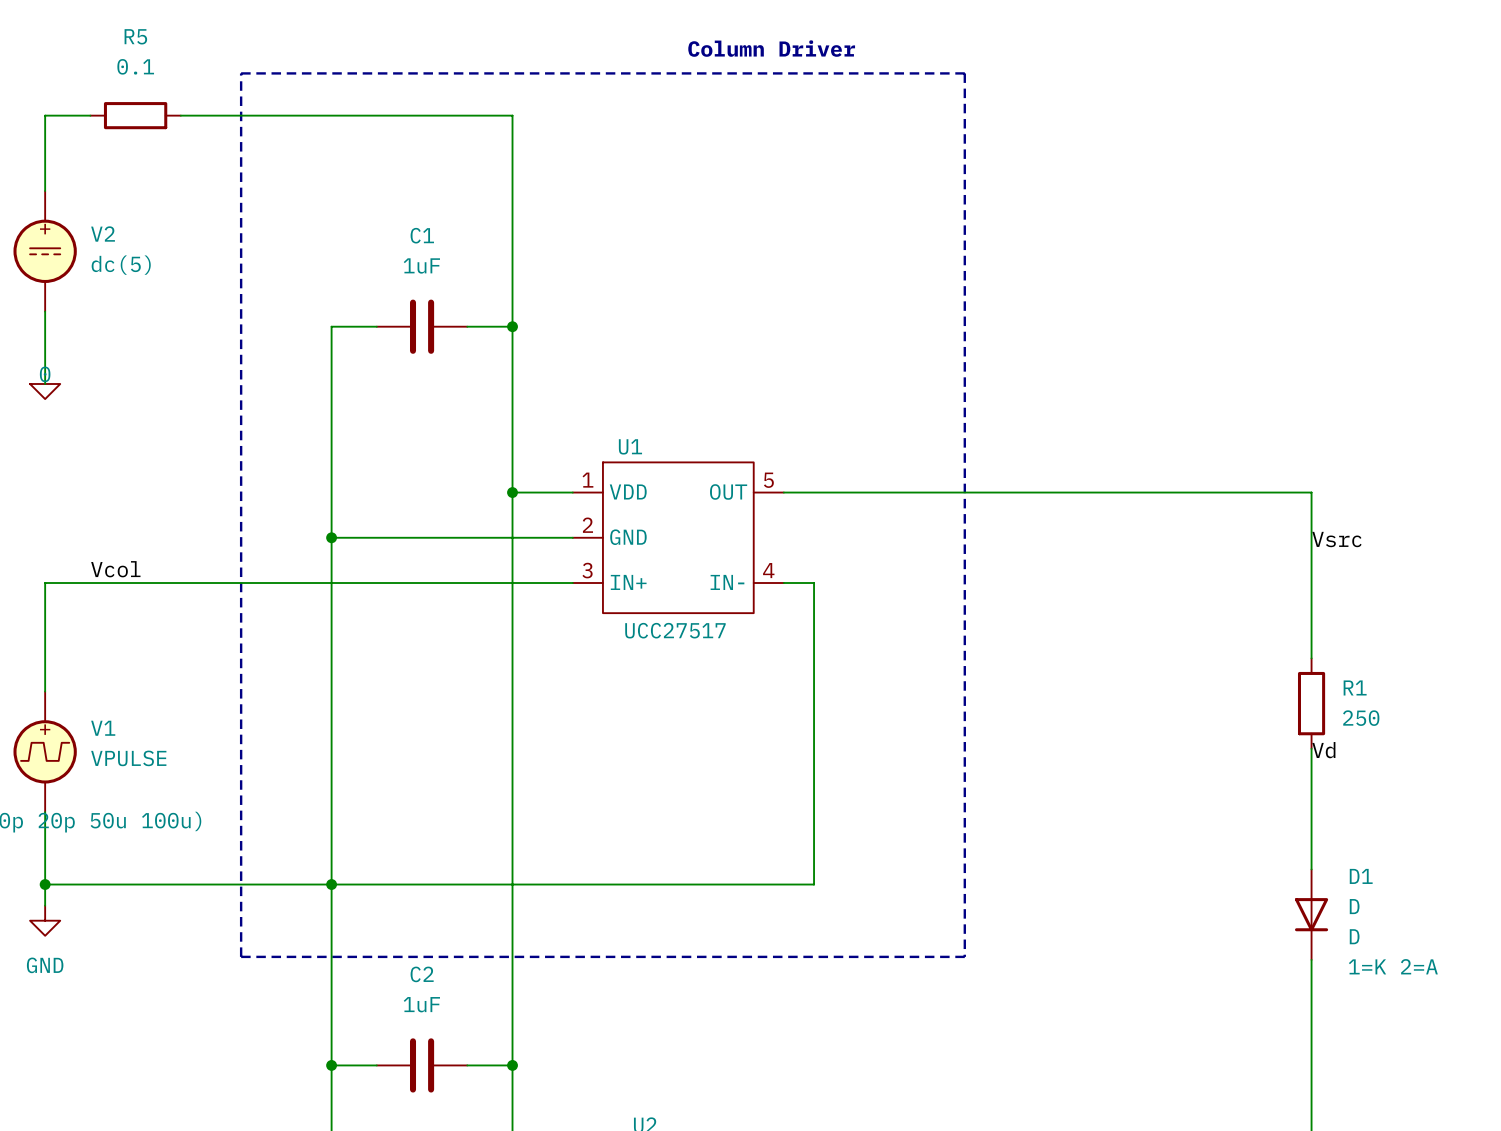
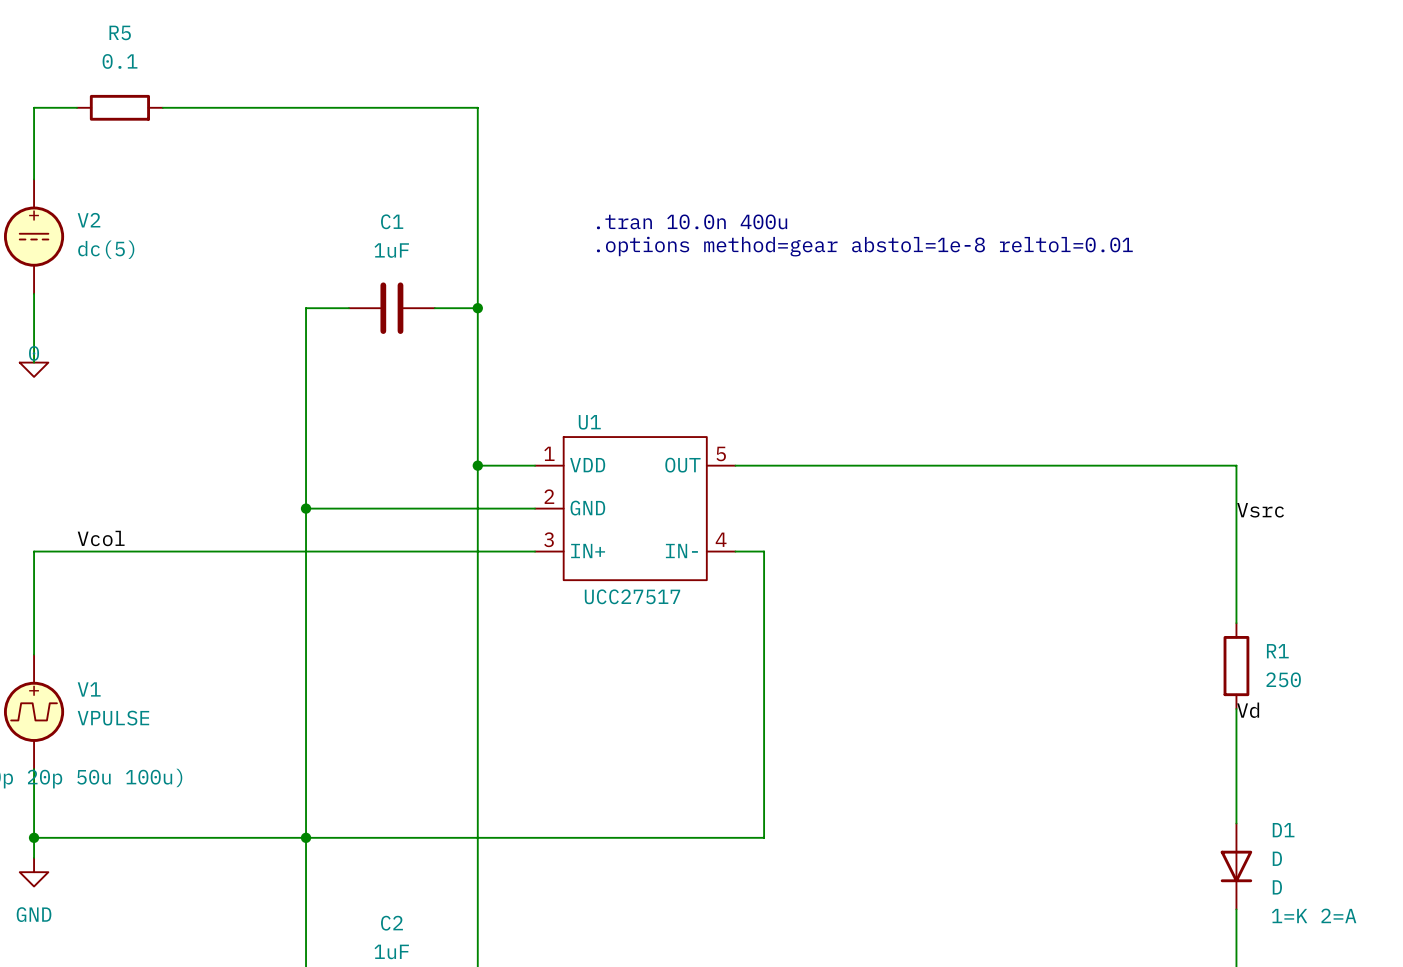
text: Column Driver (771, 48) -> none
line: (241, 73) (964, 73) (964, 956) (241, 956) (241, 73) -> none
text: none -> .tran 10.0n 400u (692, 221)
text: none -> .options method=gear abstol=1e-8 reltol=0.01 (864, 246)

